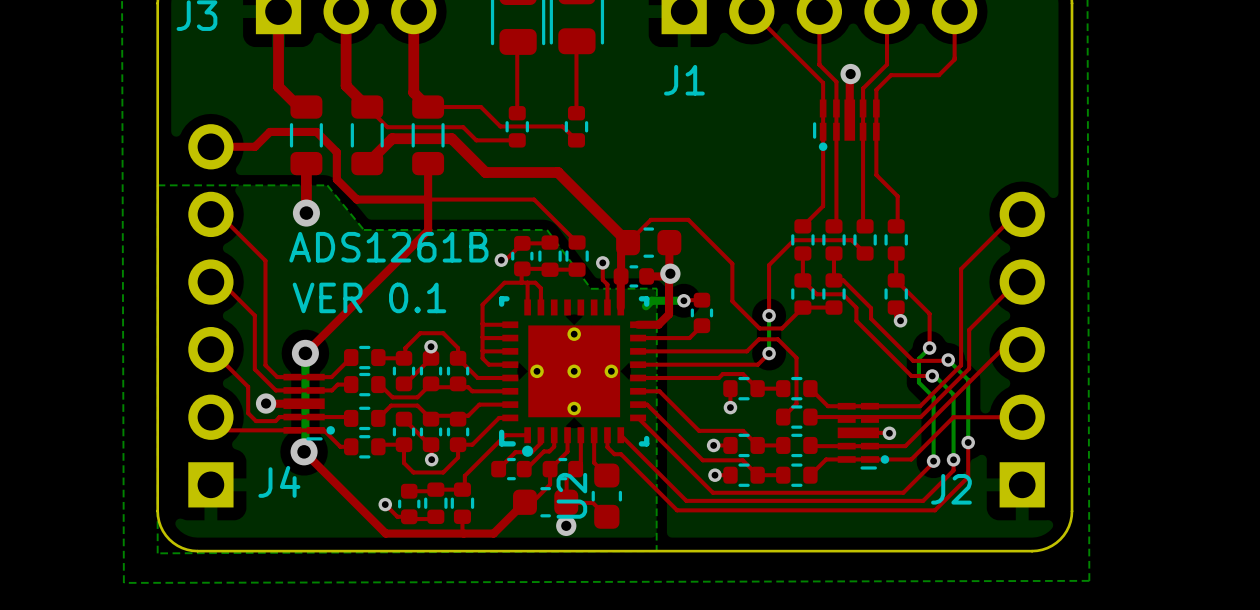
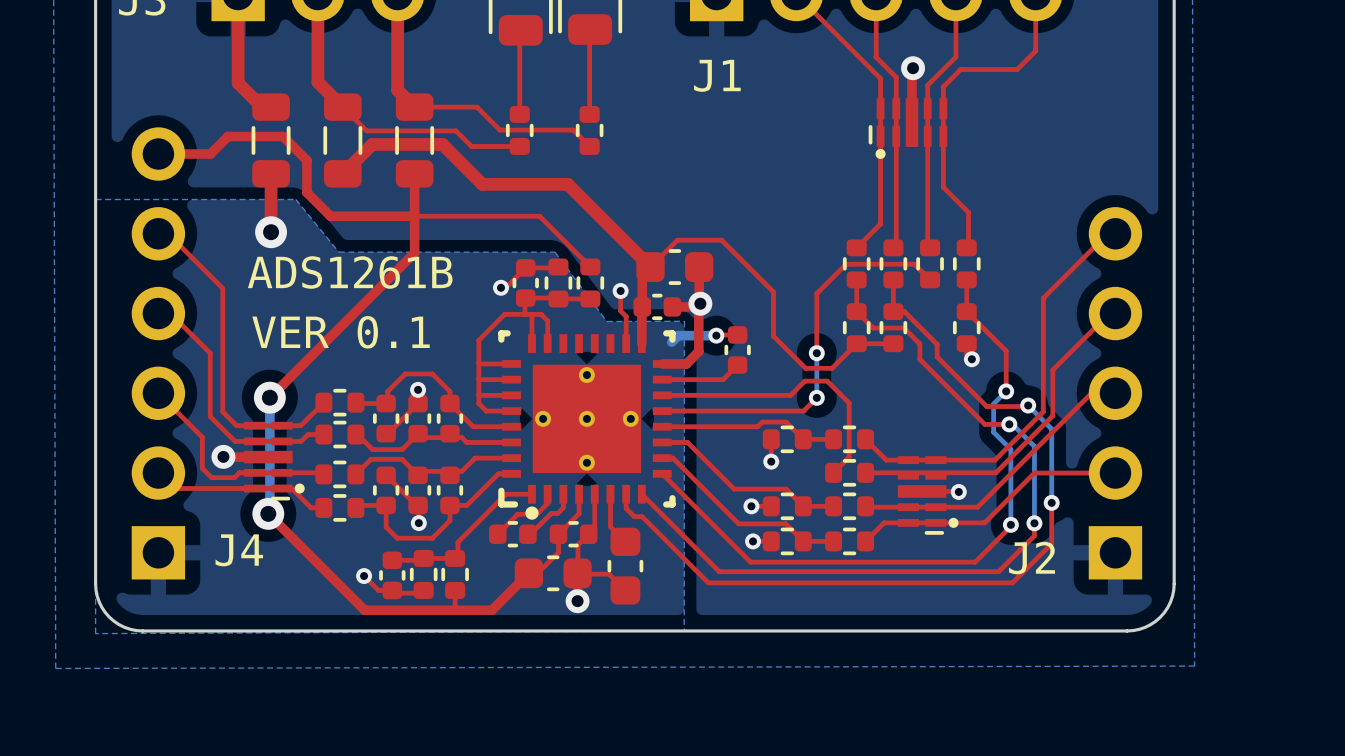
U2 name: U2 (571, 495) -> none

